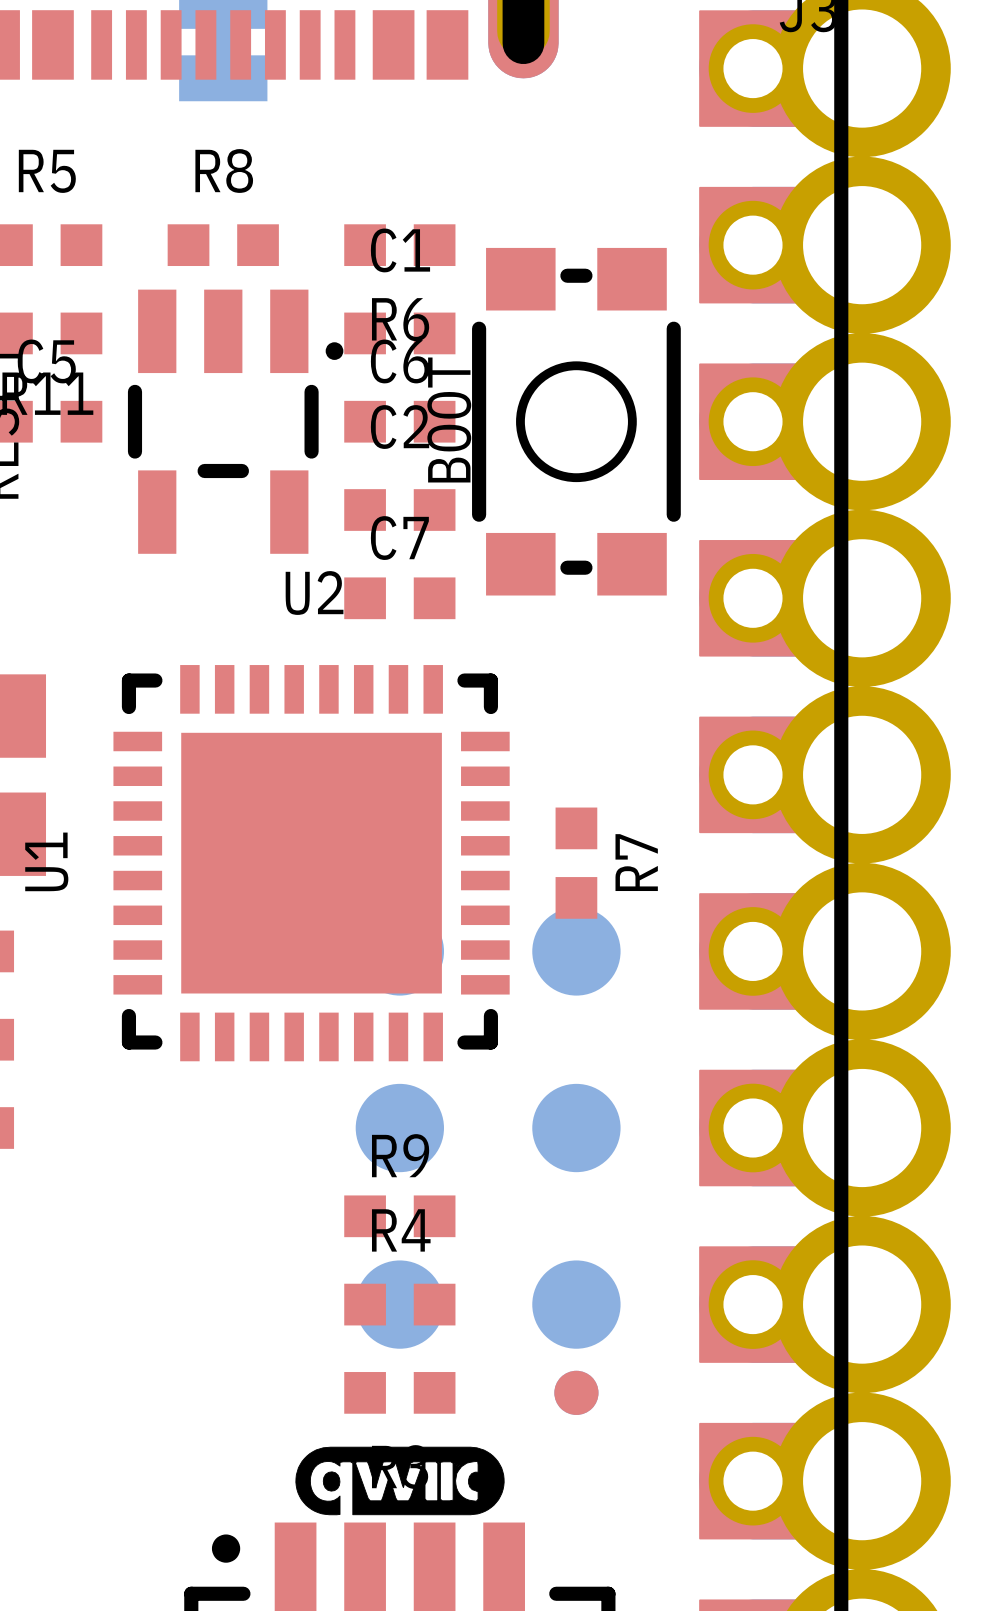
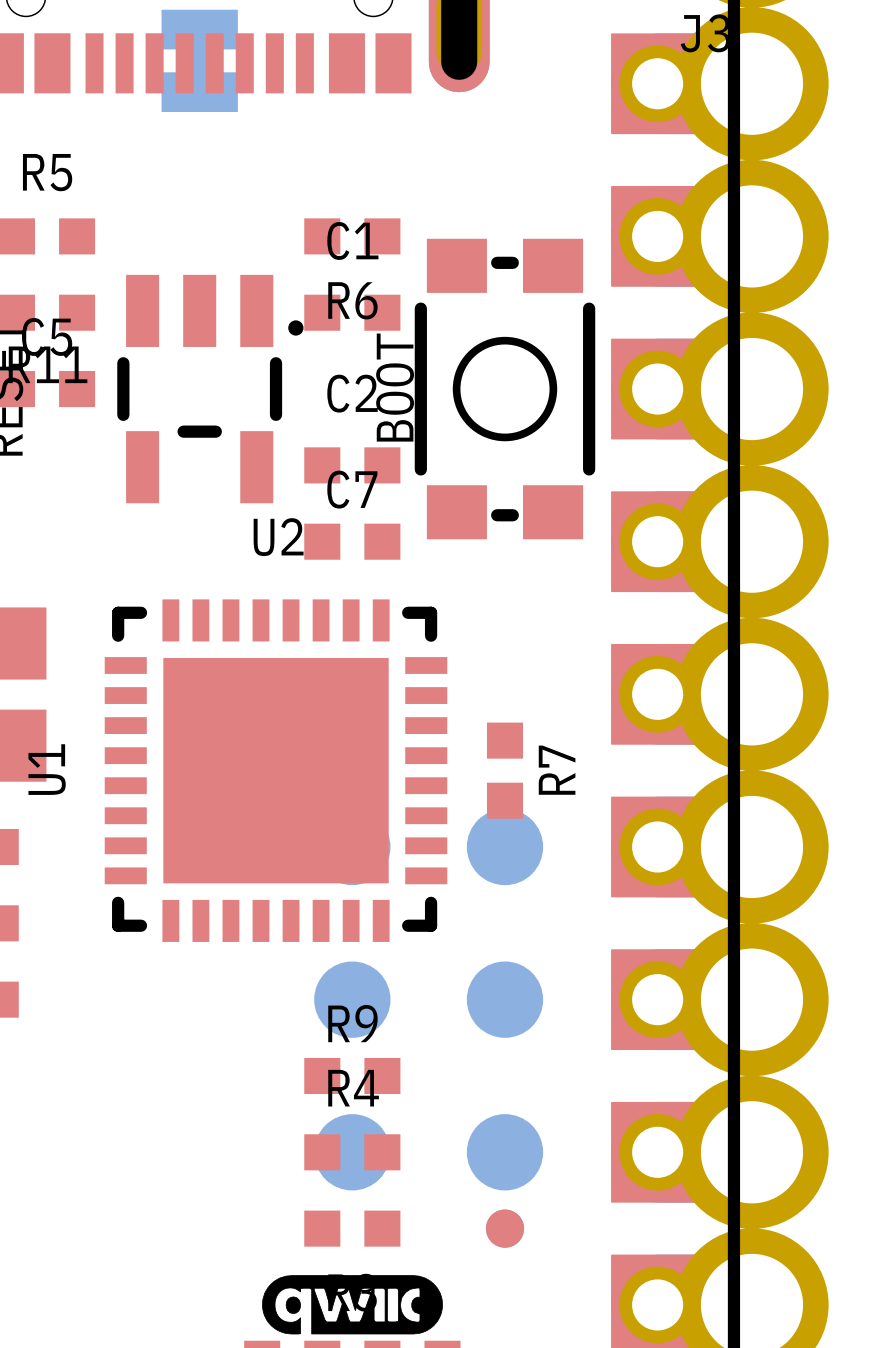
R8: (223, 245) -> none
C6: (399, 421) -> none

